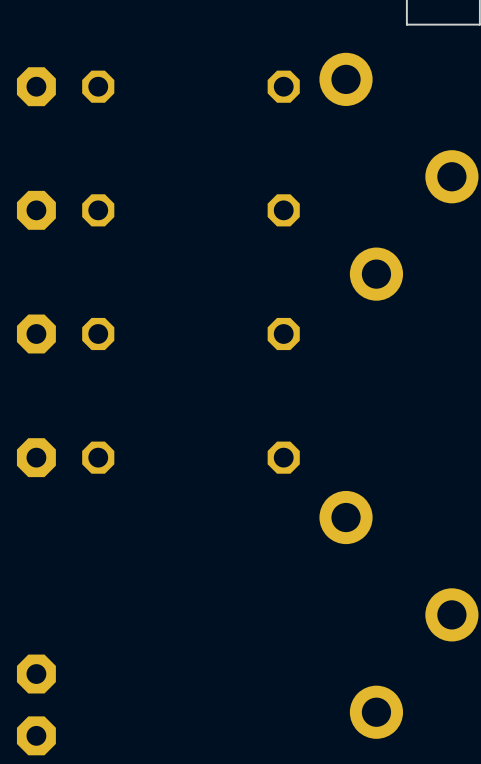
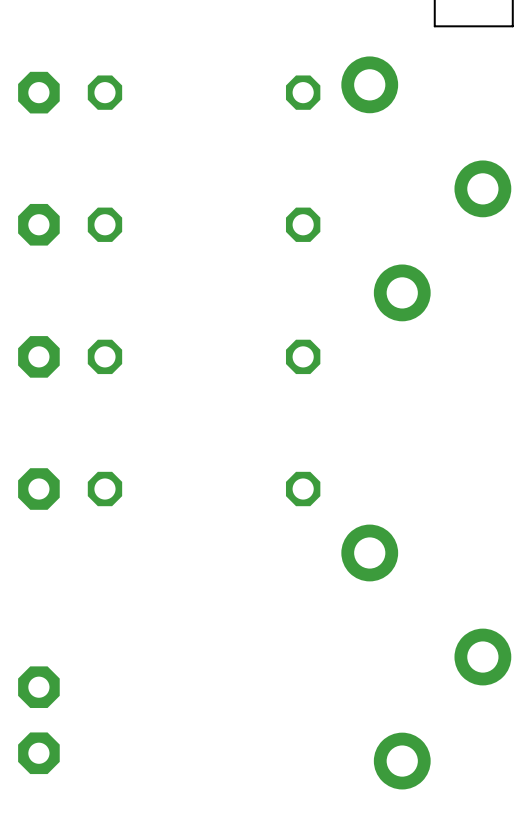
part position: (36, 704) -> (38, 720)

